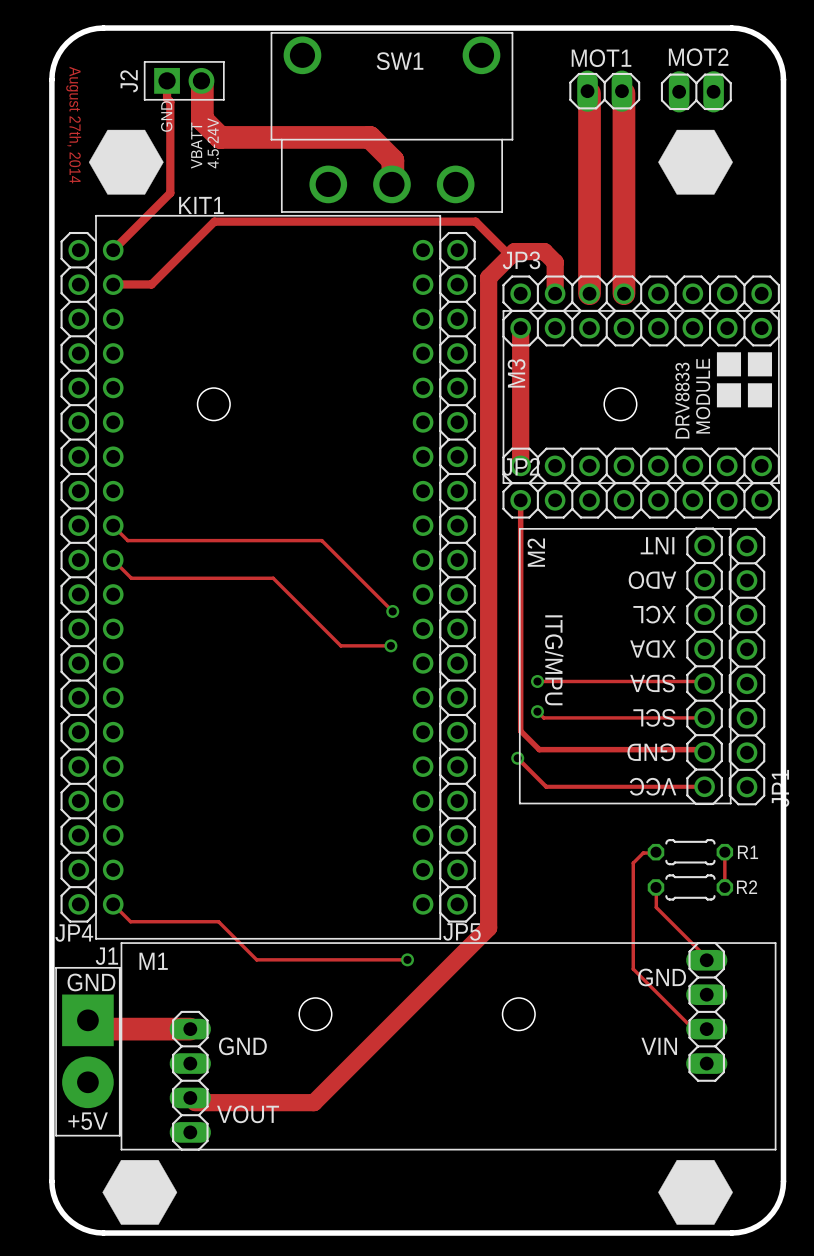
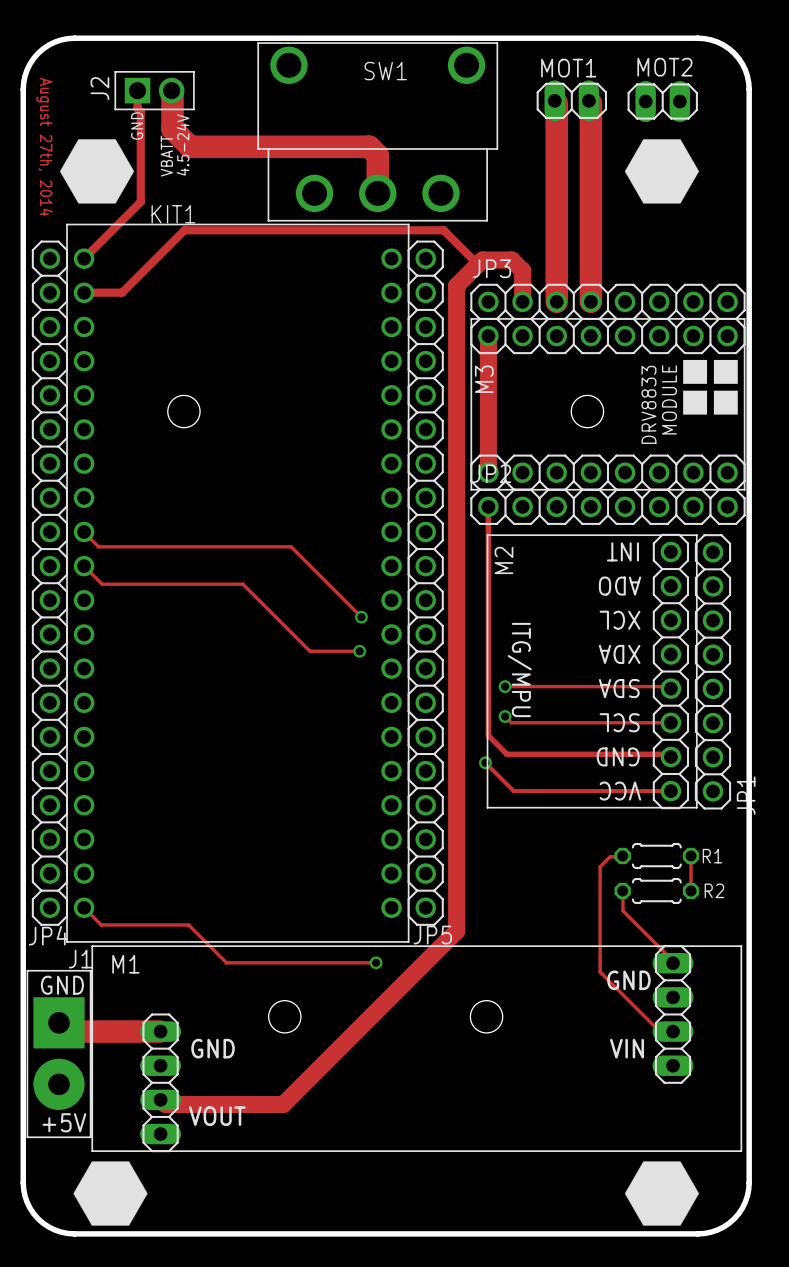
SW1 position: (391, 122) -> (377, 131)
track: (369, 137) (392, 160) (391, 184) -> (338, 146) (369, 146) (377, 155) (377, 193)

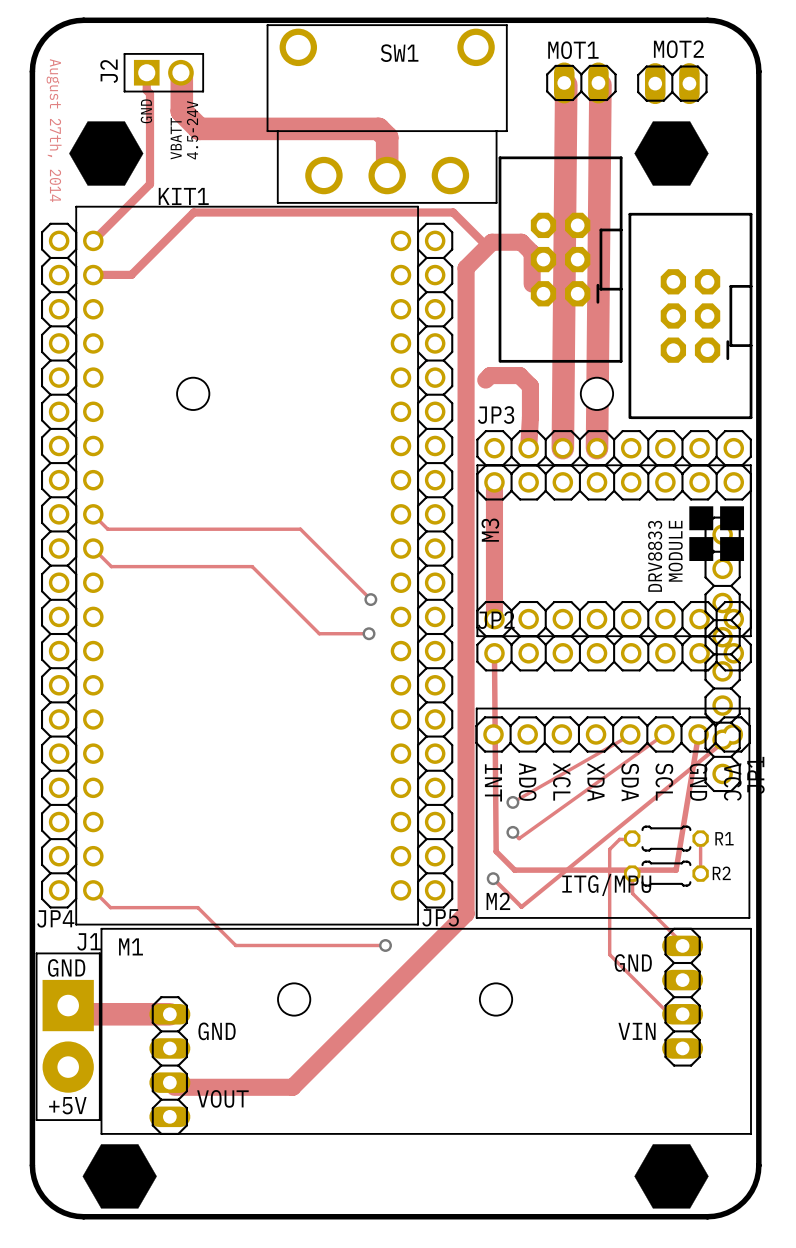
track: (556, 102) (556, 301) -> (566, 84) (562, 448)
track: (590, 102) (590, 301) -> (600, 84) (597, 448)
part: none -> (560, 259)
JP3 position: (607, 301) -> (614, 448)
part: none -> (690, 315)
track: (488, 336) (488, 472) -> (494, 482) (494, 619)
track: none -> (485, 380) (490, 375) (519, 375) (530, 386) (528, 448)
M3 position: (607, 404) -> (614, 550)
track: (488, 506) (488, 735) (506, 754) (668, 754) (670, 756) -> none
JP2 position: (607, 506) -> (614, 653)
track: none -> (494, 653) (496, 851) (514, 870) (676, 870) (698, 734)
M2 rotation: 0° (592, 671) -> 90° counterclockwise (613, 813)
track: (505, 686) (668, 686) (670, 688) -> none
via: (505, 686) -> none
track: (505, 716) (511, 722) (670, 722) -> none
via: (505, 716) -> none
track: none -> (630, 734) (512, 802)
track: none -> (664, 734) (519, 838) (512, 832)
track: none -> (732, 734) (521, 906) (493, 878)
track: (485, 762) (513, 791) (670, 791) -> none
via: (485, 762) -> none
via: none -> (512, 802)
via: none -> (512, 832)
via: none -> (493, 878)

